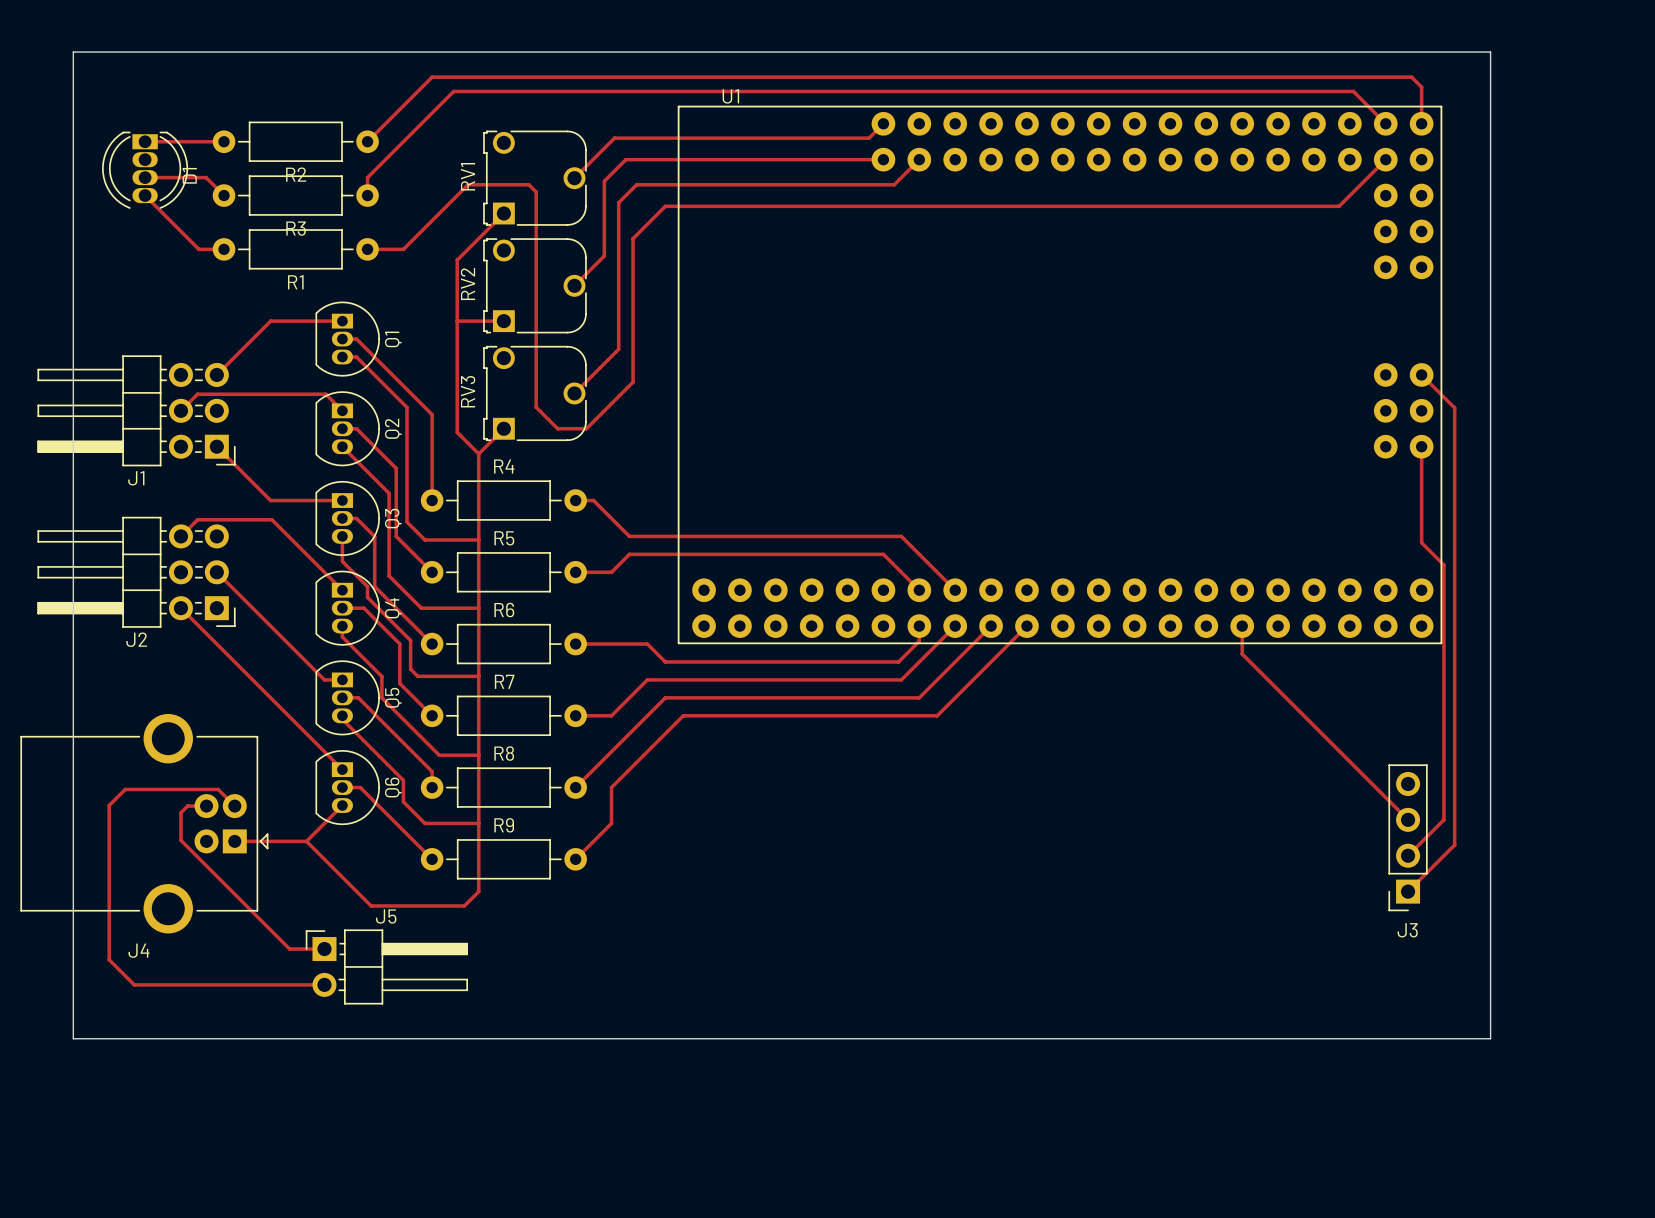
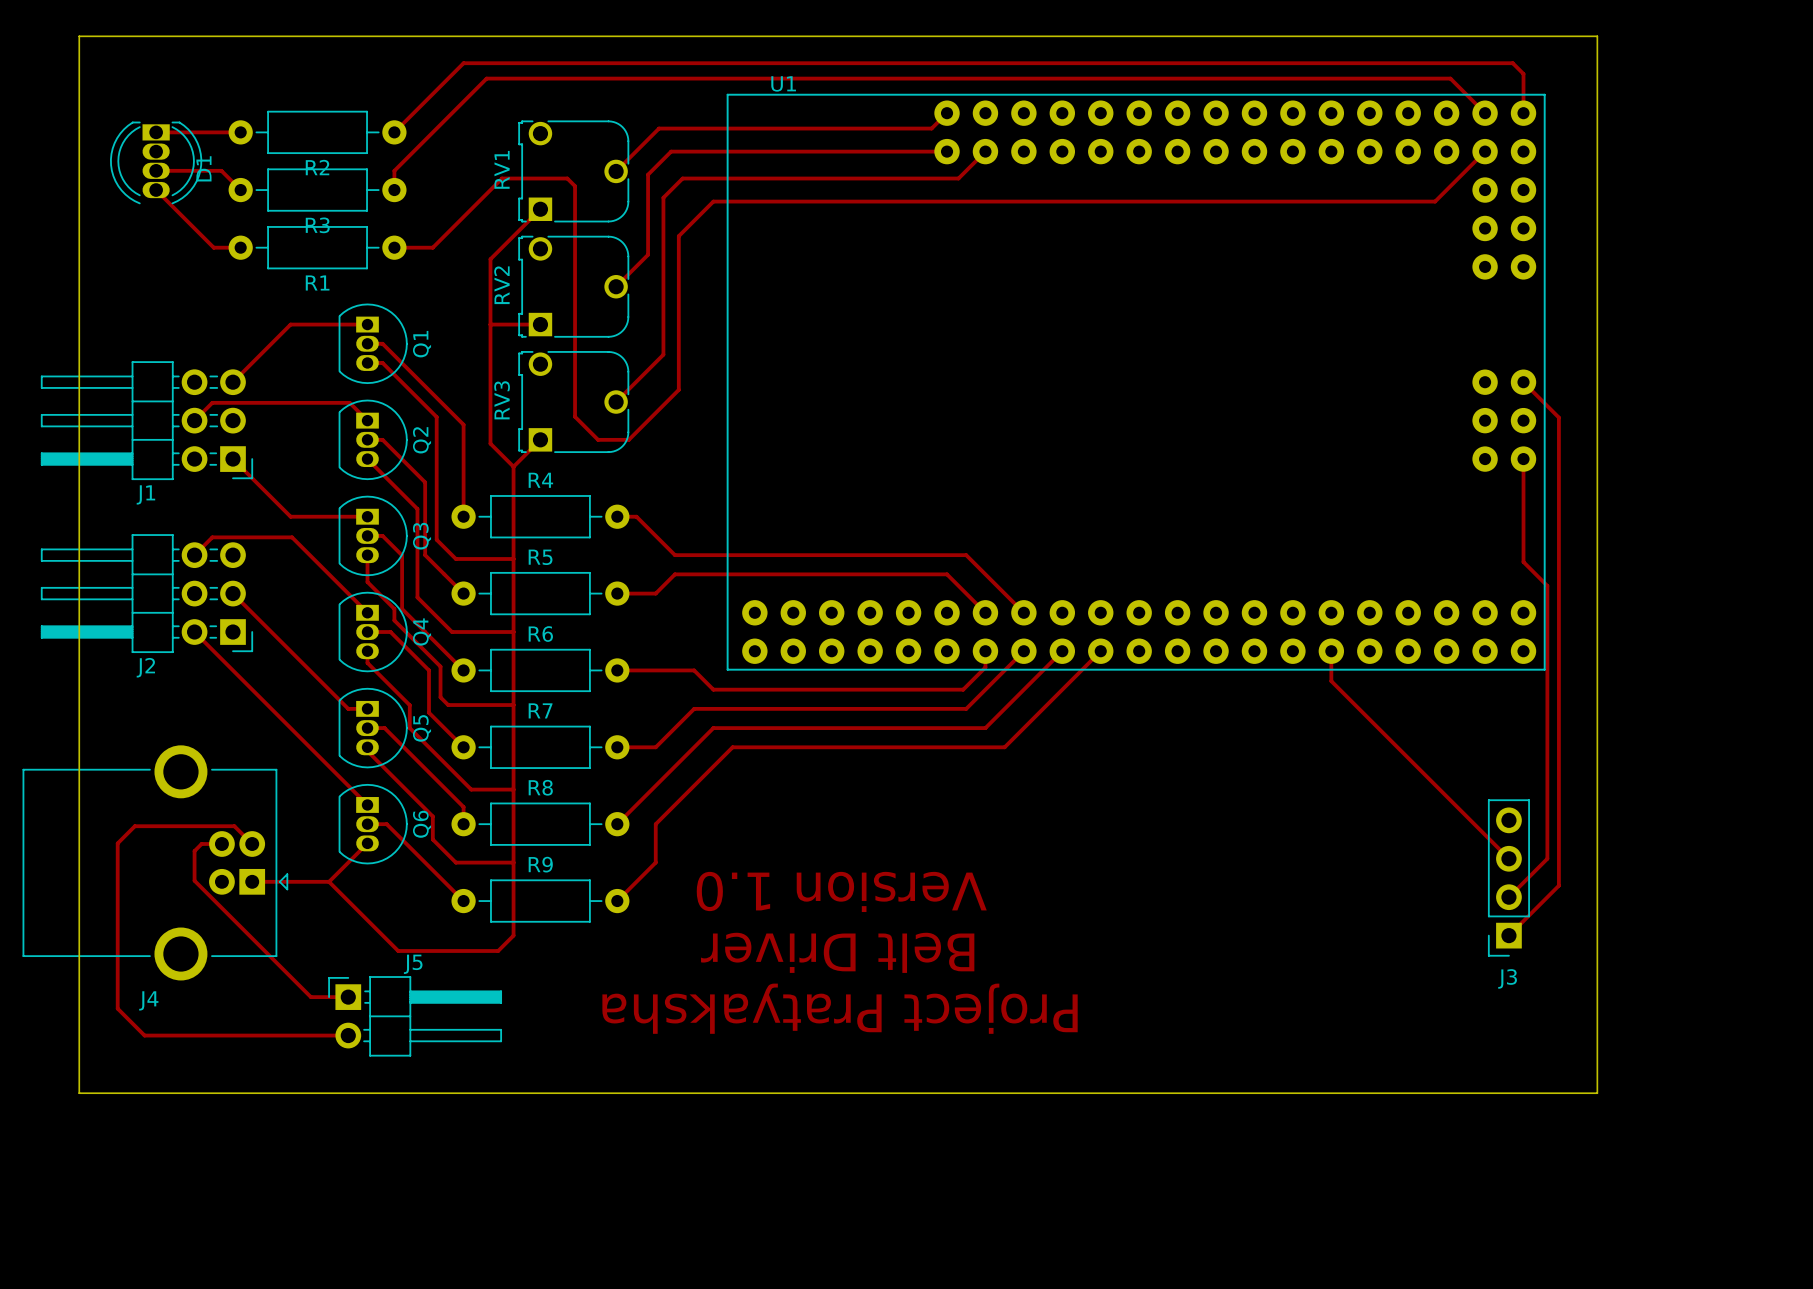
text: none -> Version 1.0 (841, 891)
text: none -> Belt Driver (837, 952)
text: none -> Project Pratyaksha (840, 1008)

